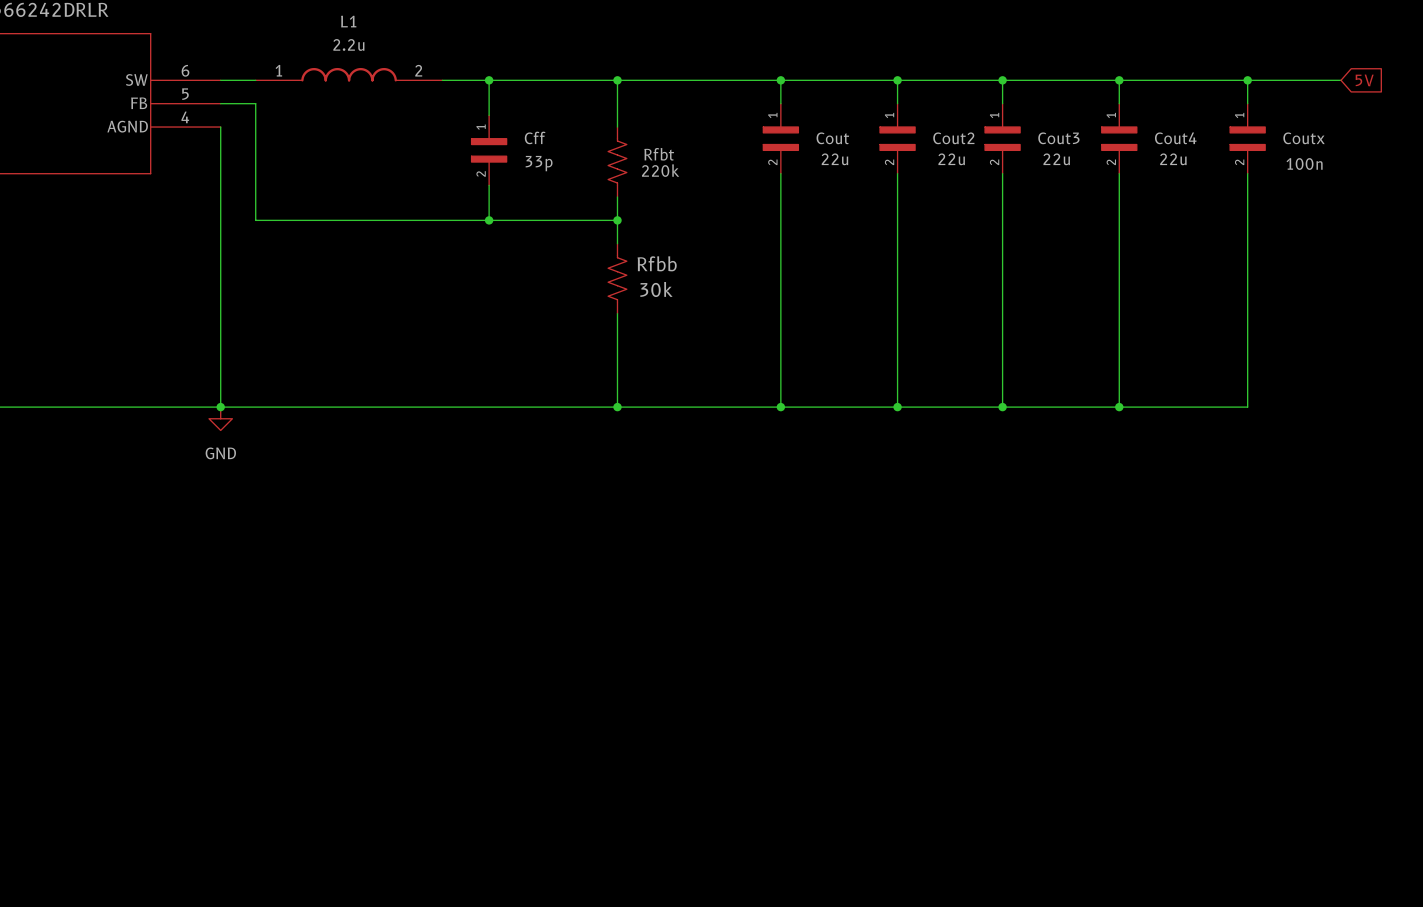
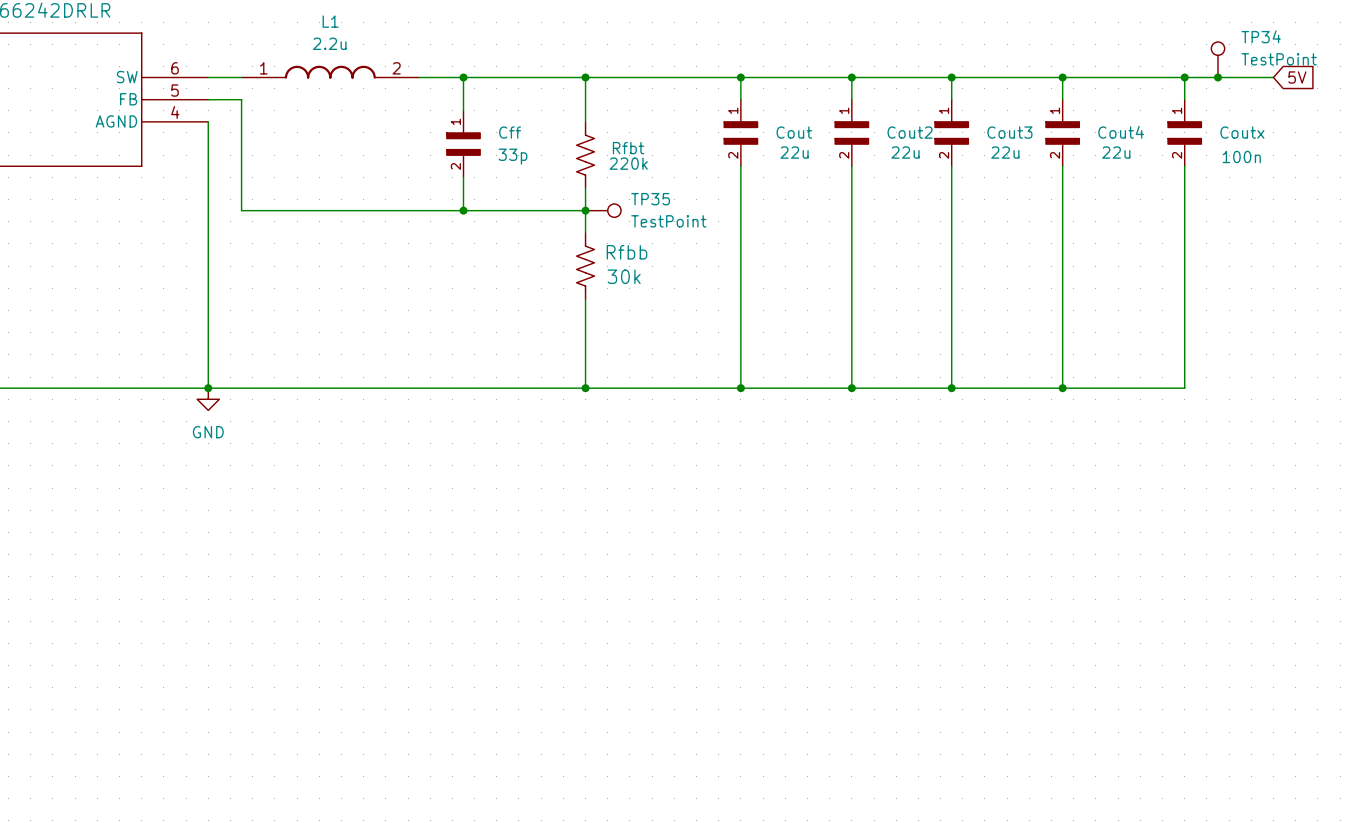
TP34: none -> TestPoint (1218, 59)
junction: none -> (1218, 77)
TP35: none -> TestPoint (603, 210)

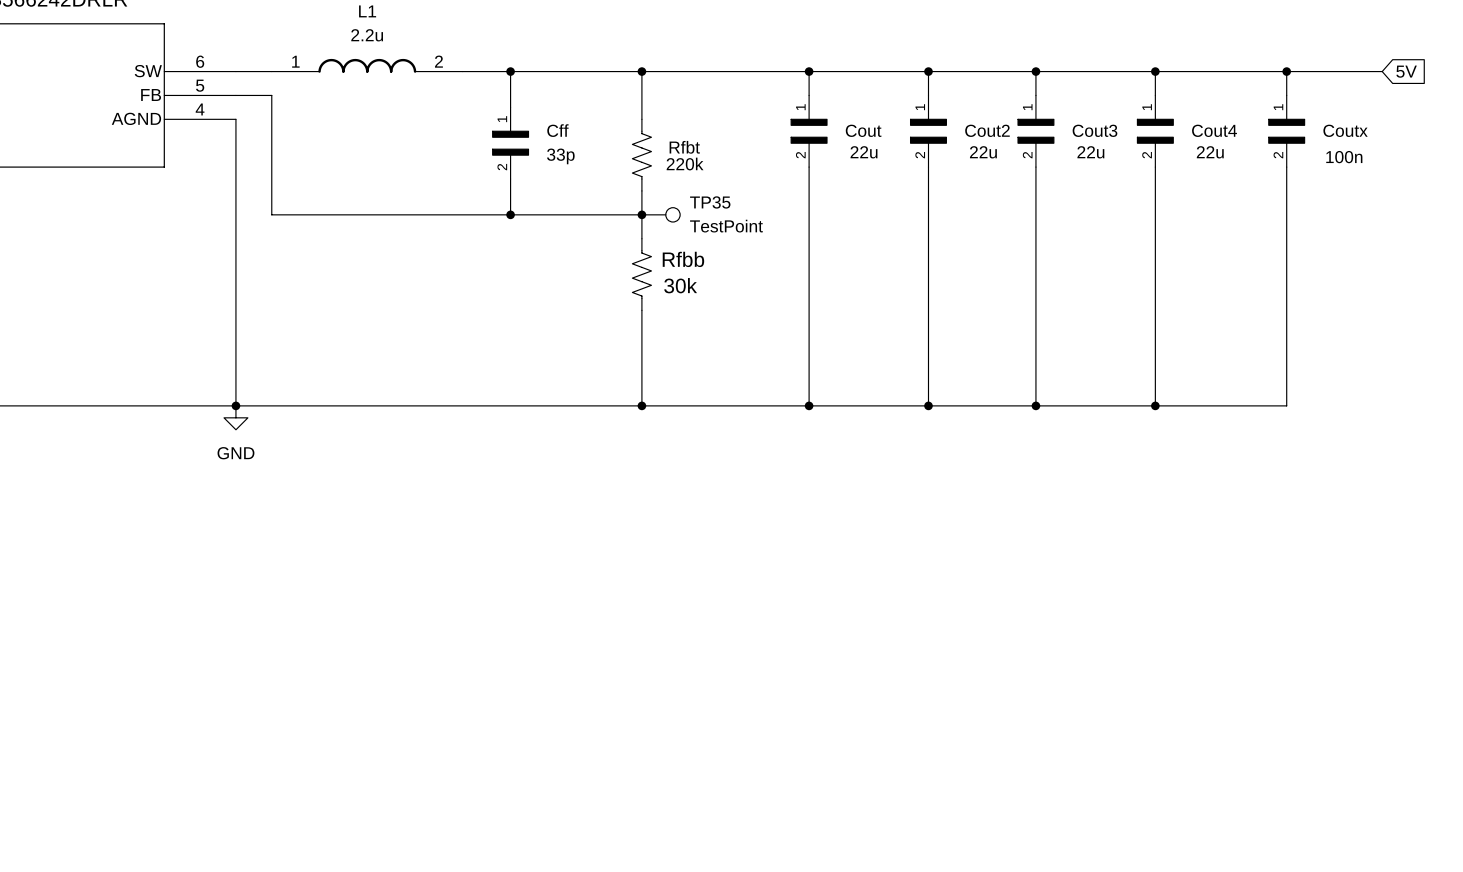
TP34: TestPoint (1218, 59) -> none
junction: (1218, 77) -> none

